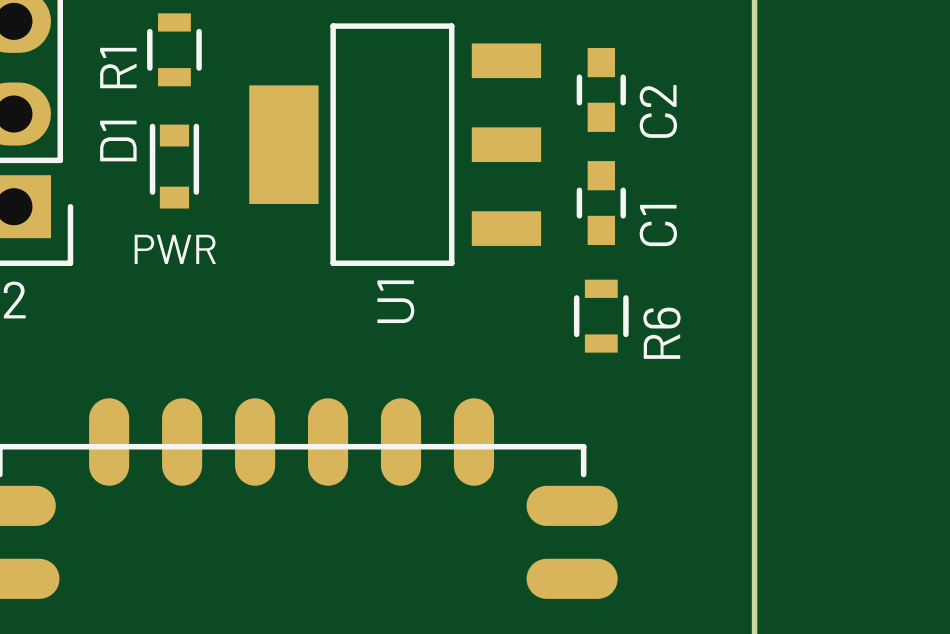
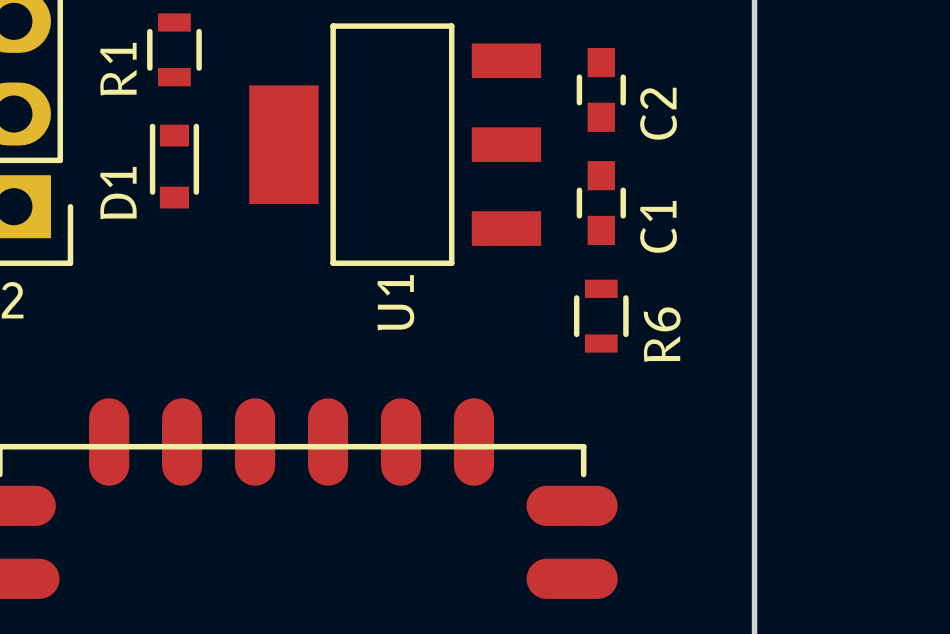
D1 name position: D1 (118, 141) -> D1 (118, 193)
text: PWR (175, 249) -> none

